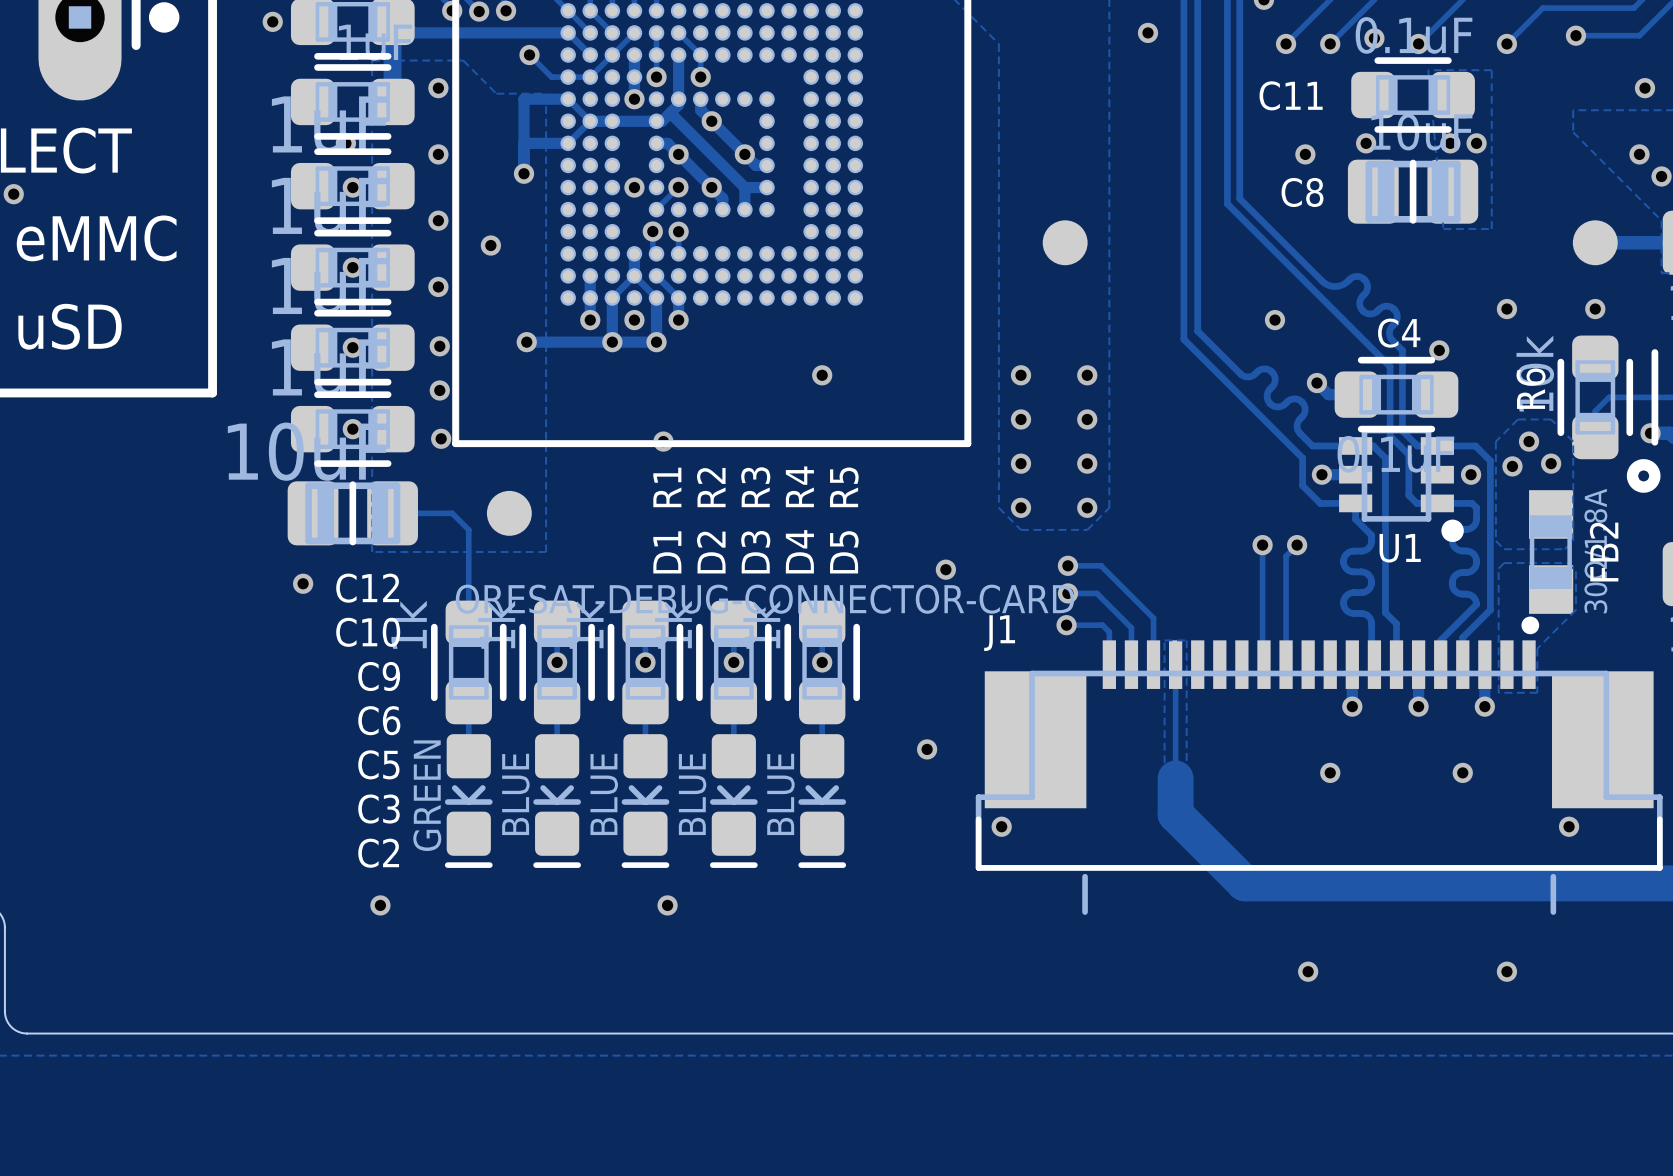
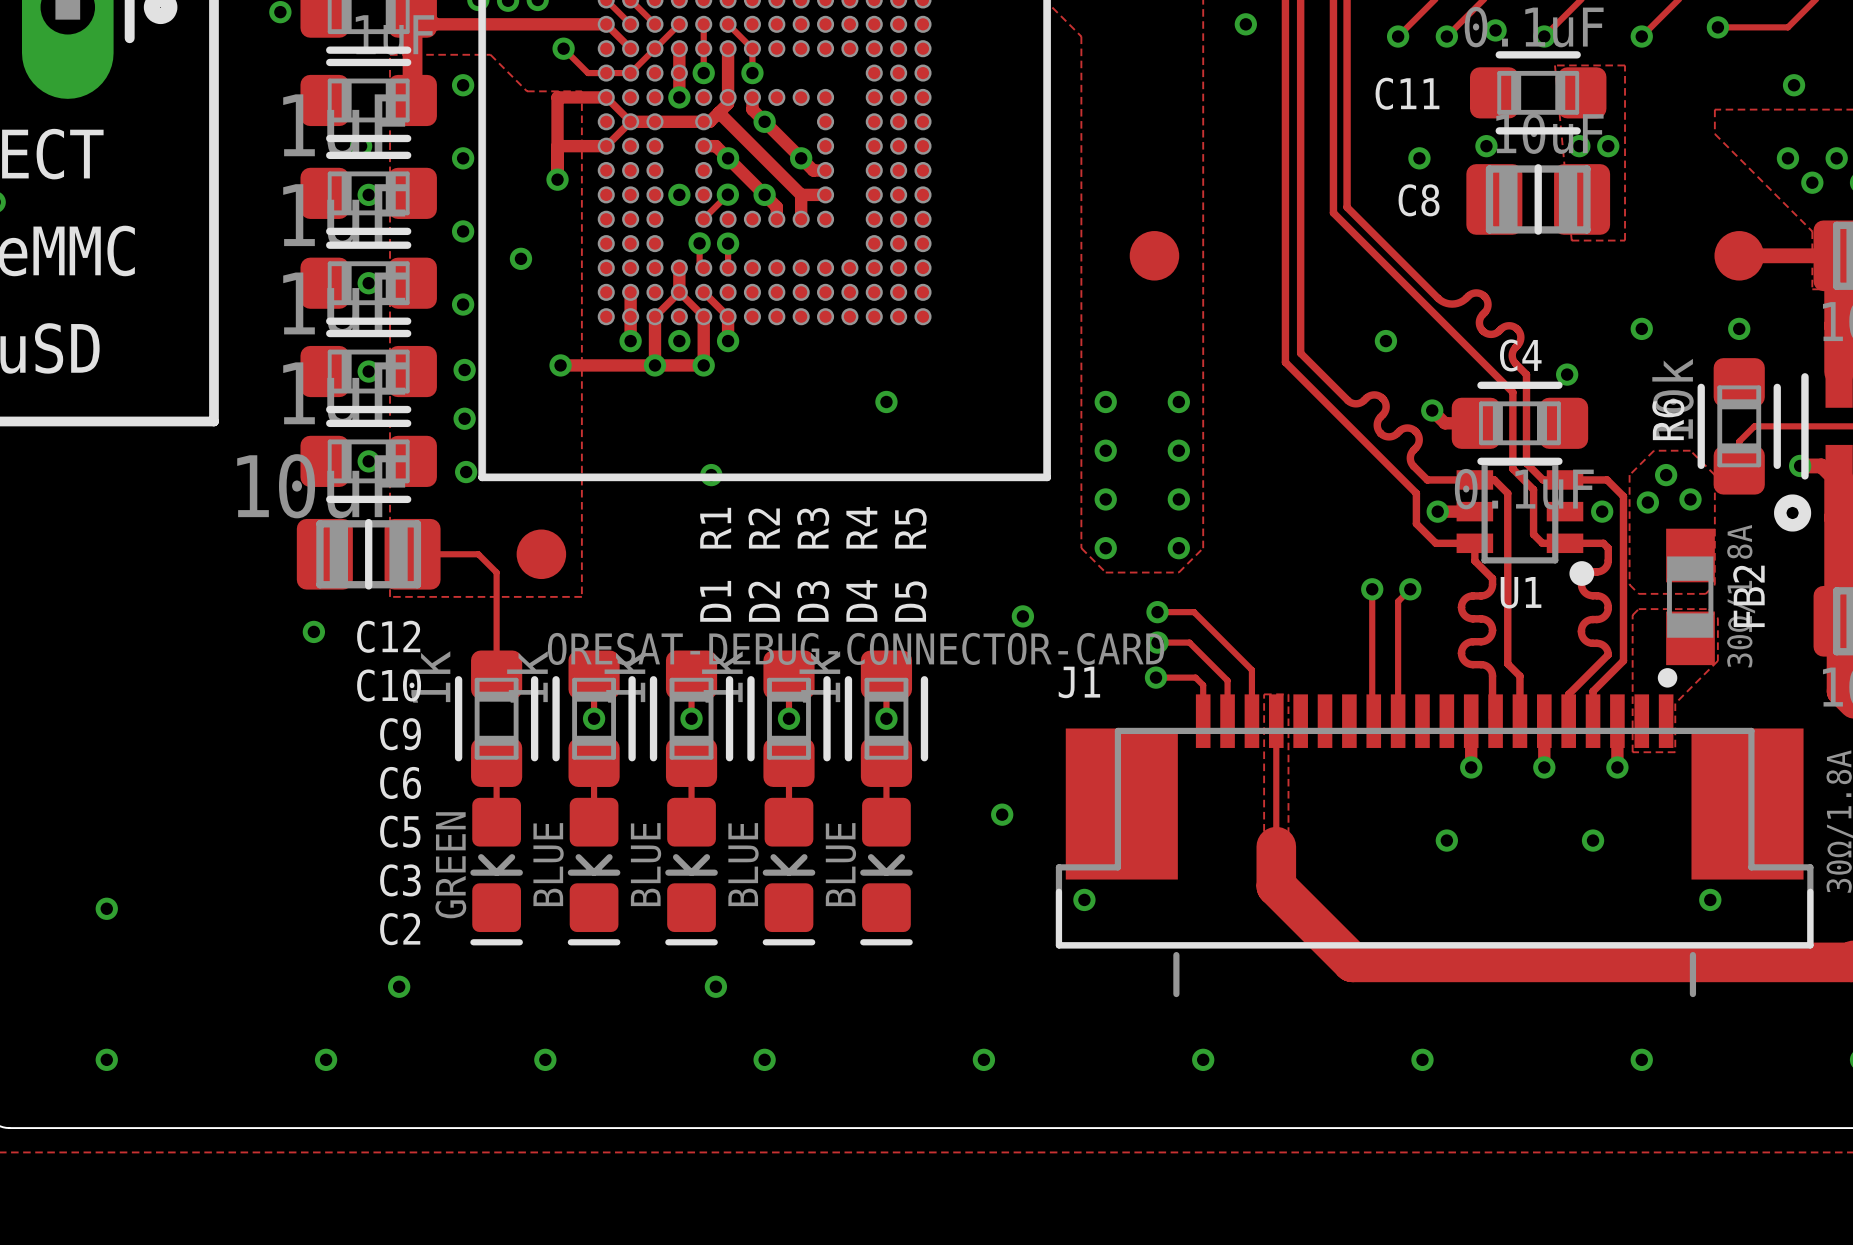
via: none -> (106, 908)
via: none -> (106, 1059)
via: none -> (326, 1059)
via: none -> (545, 1059)
via: none -> (764, 1059)
via: none -> (983, 1059)
via: none -> (1203, 1059)

